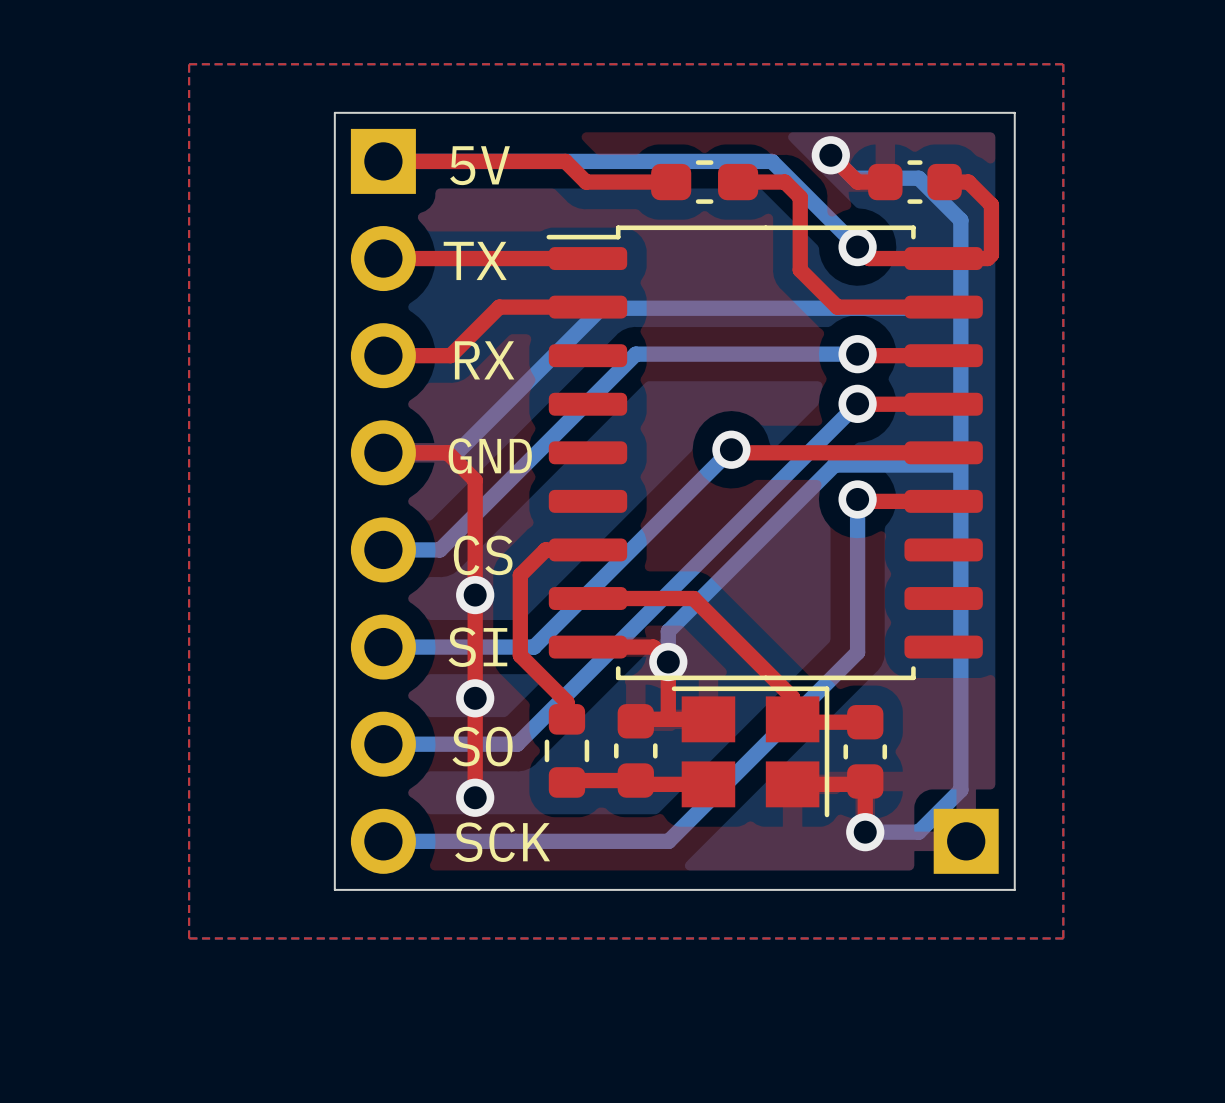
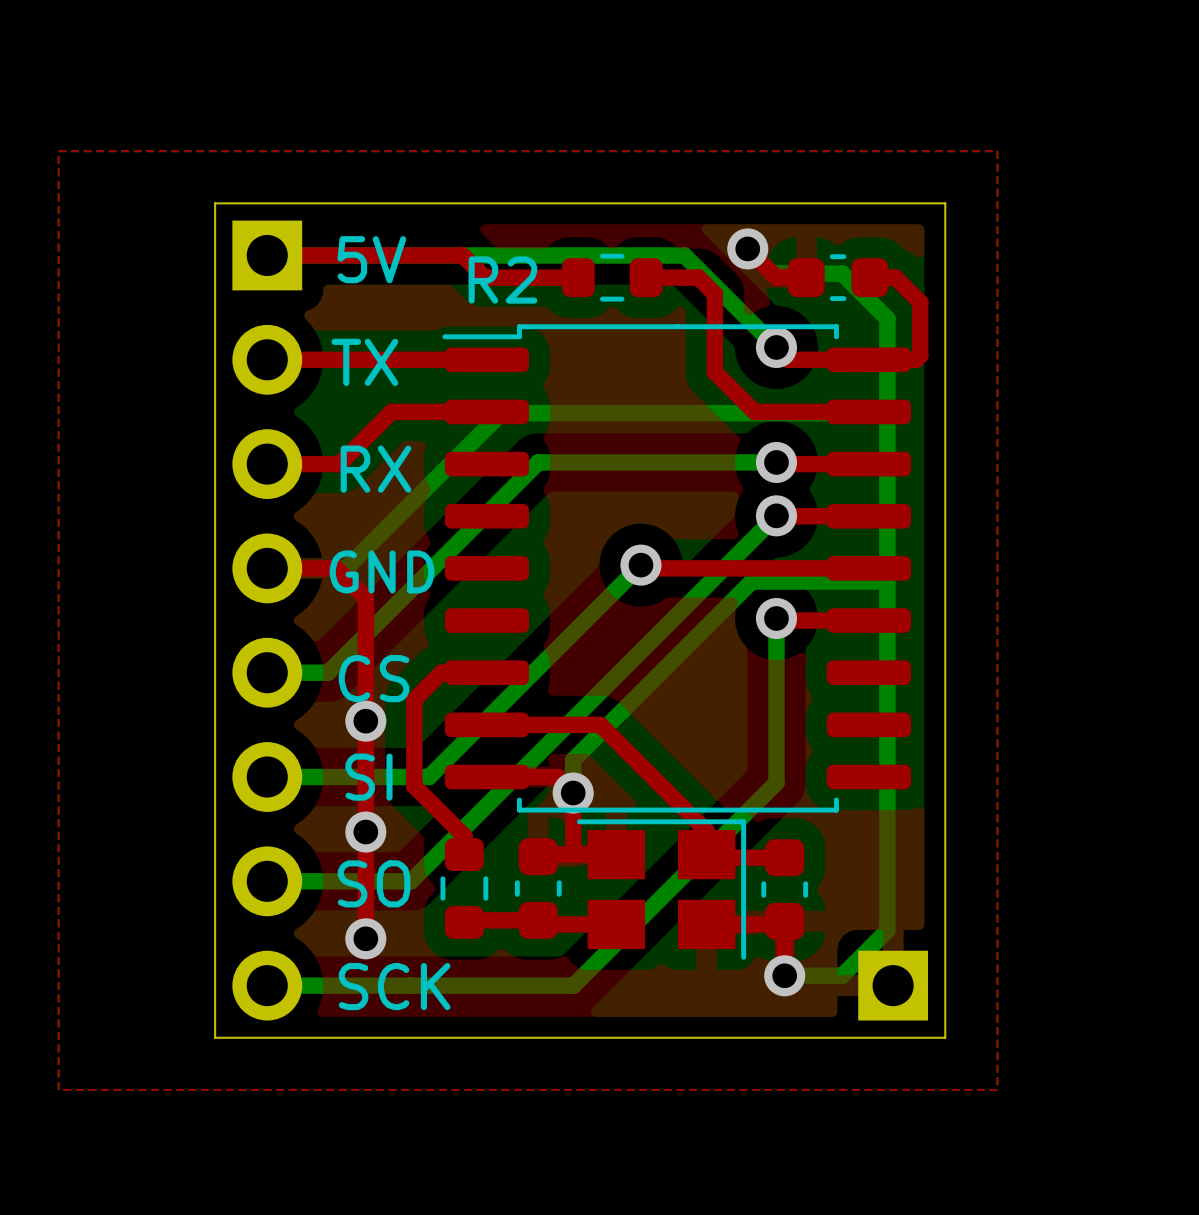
part: (704, 182) -> none
R2: none -> (612, 277)

